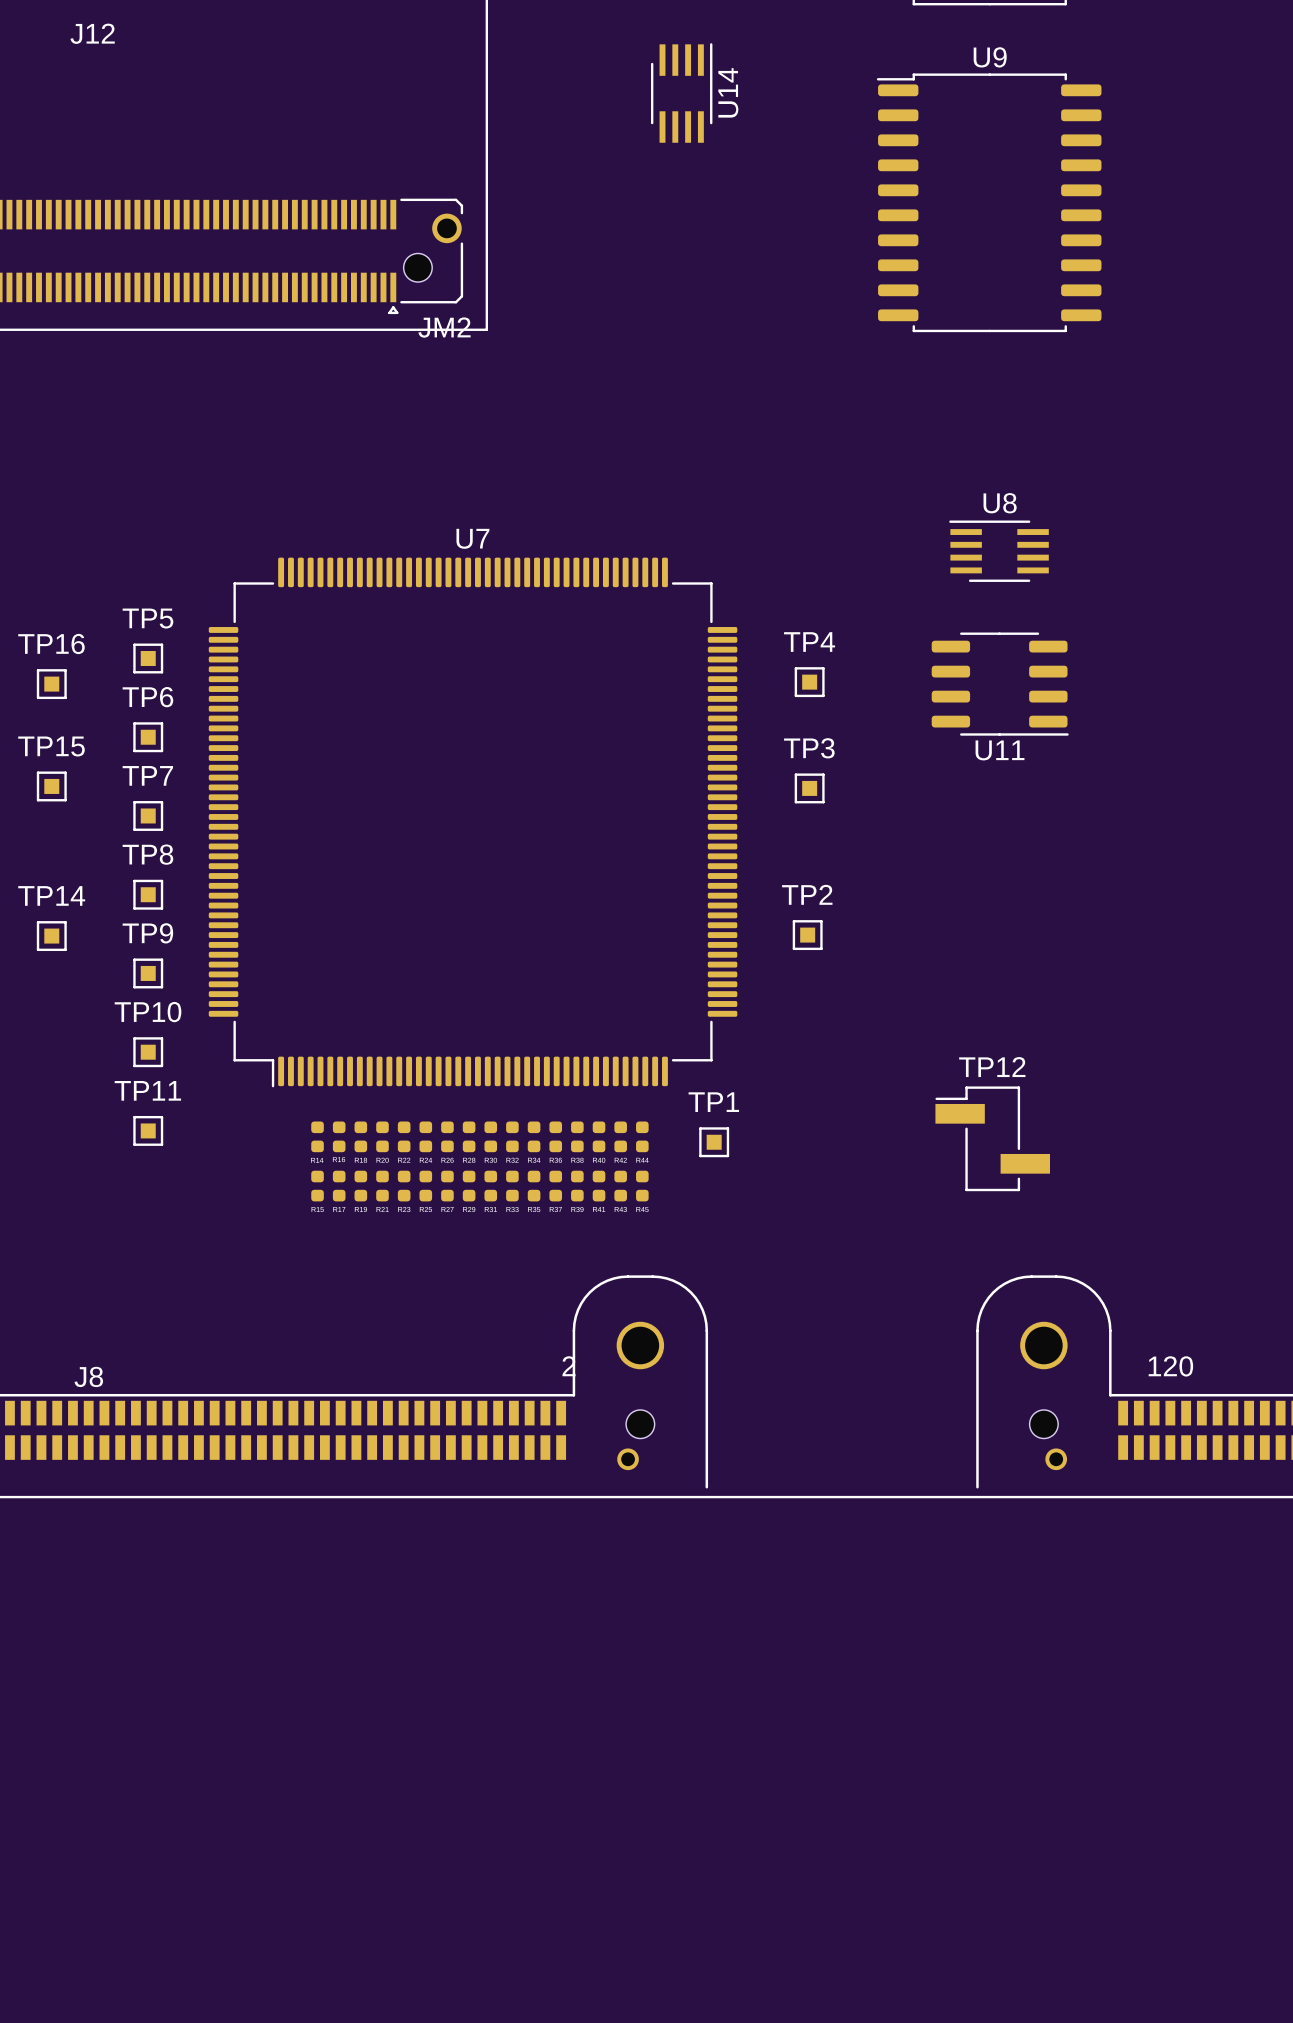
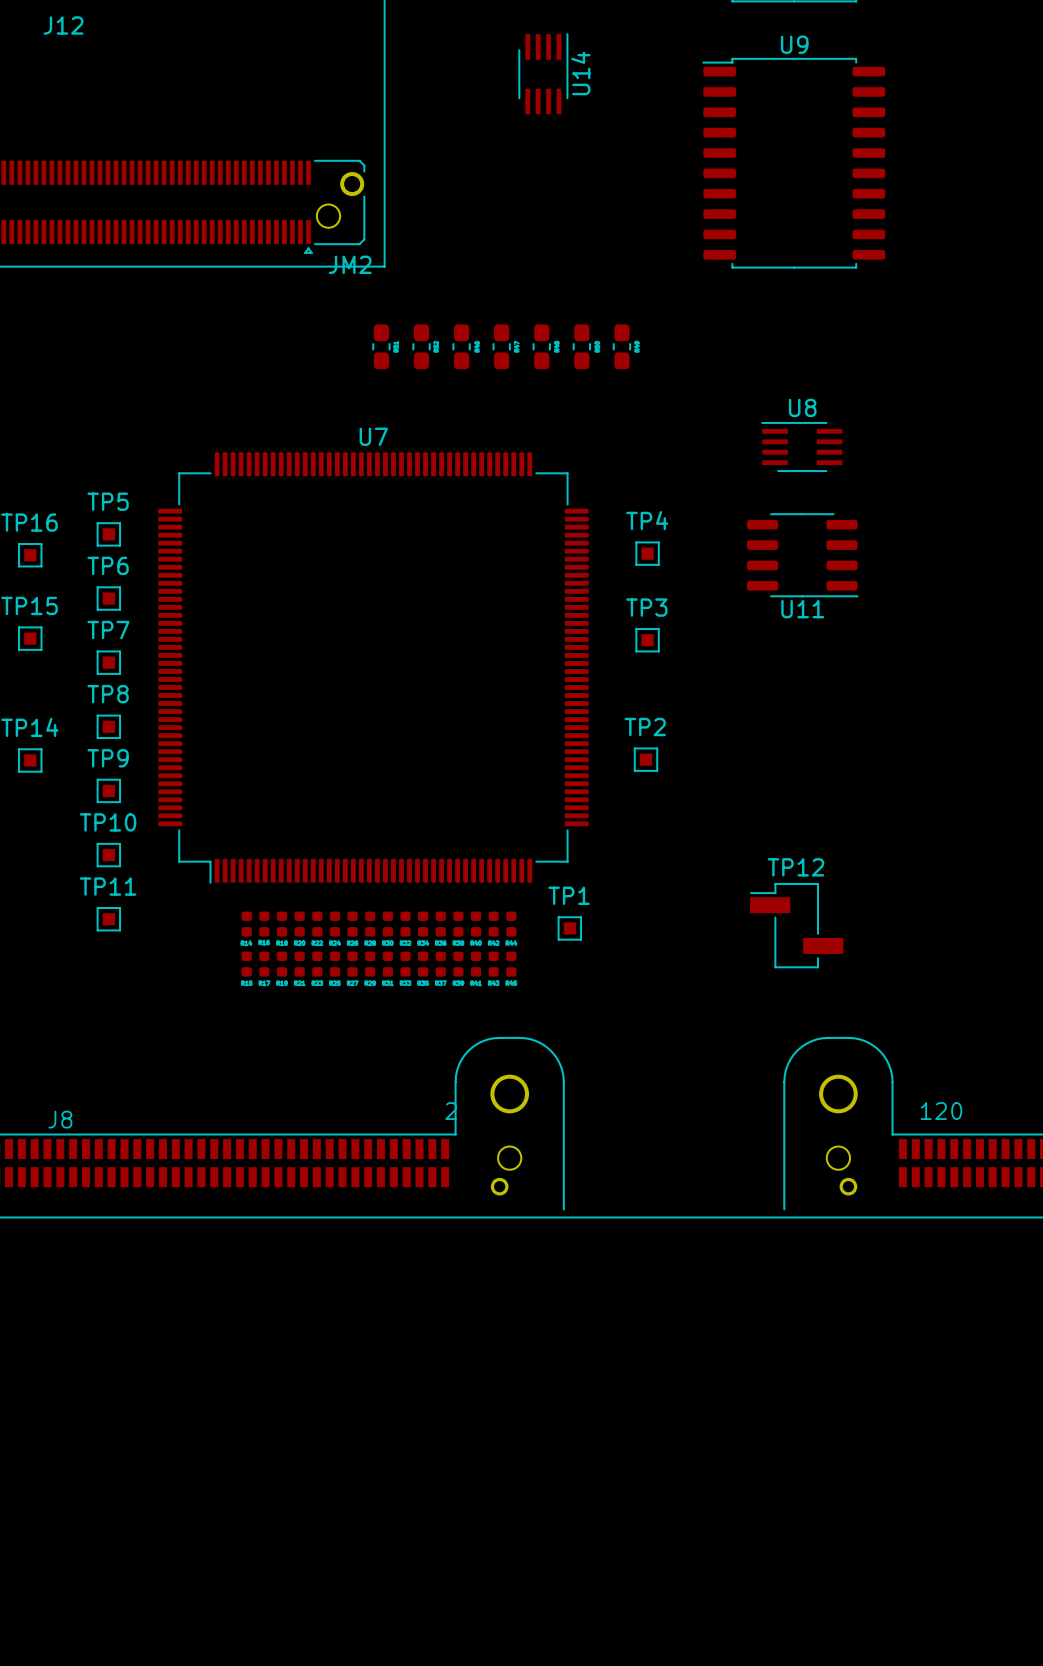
part: none -> (381, 346)
part: none -> (421, 346)
part: none -> (461, 346)
part: none -> (501, 346)
part: none -> (541, 346)
part: none -> (581, 346)
part: none -> (621, 346)

